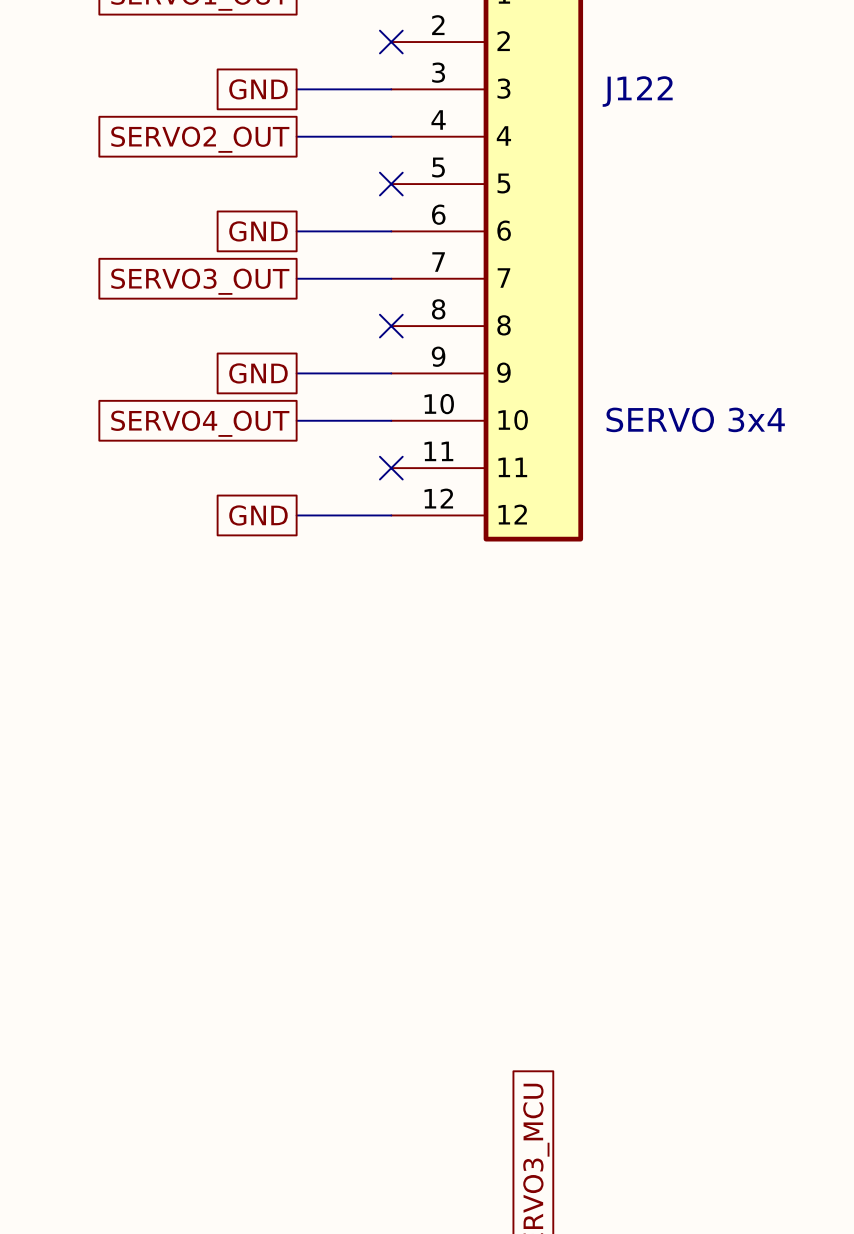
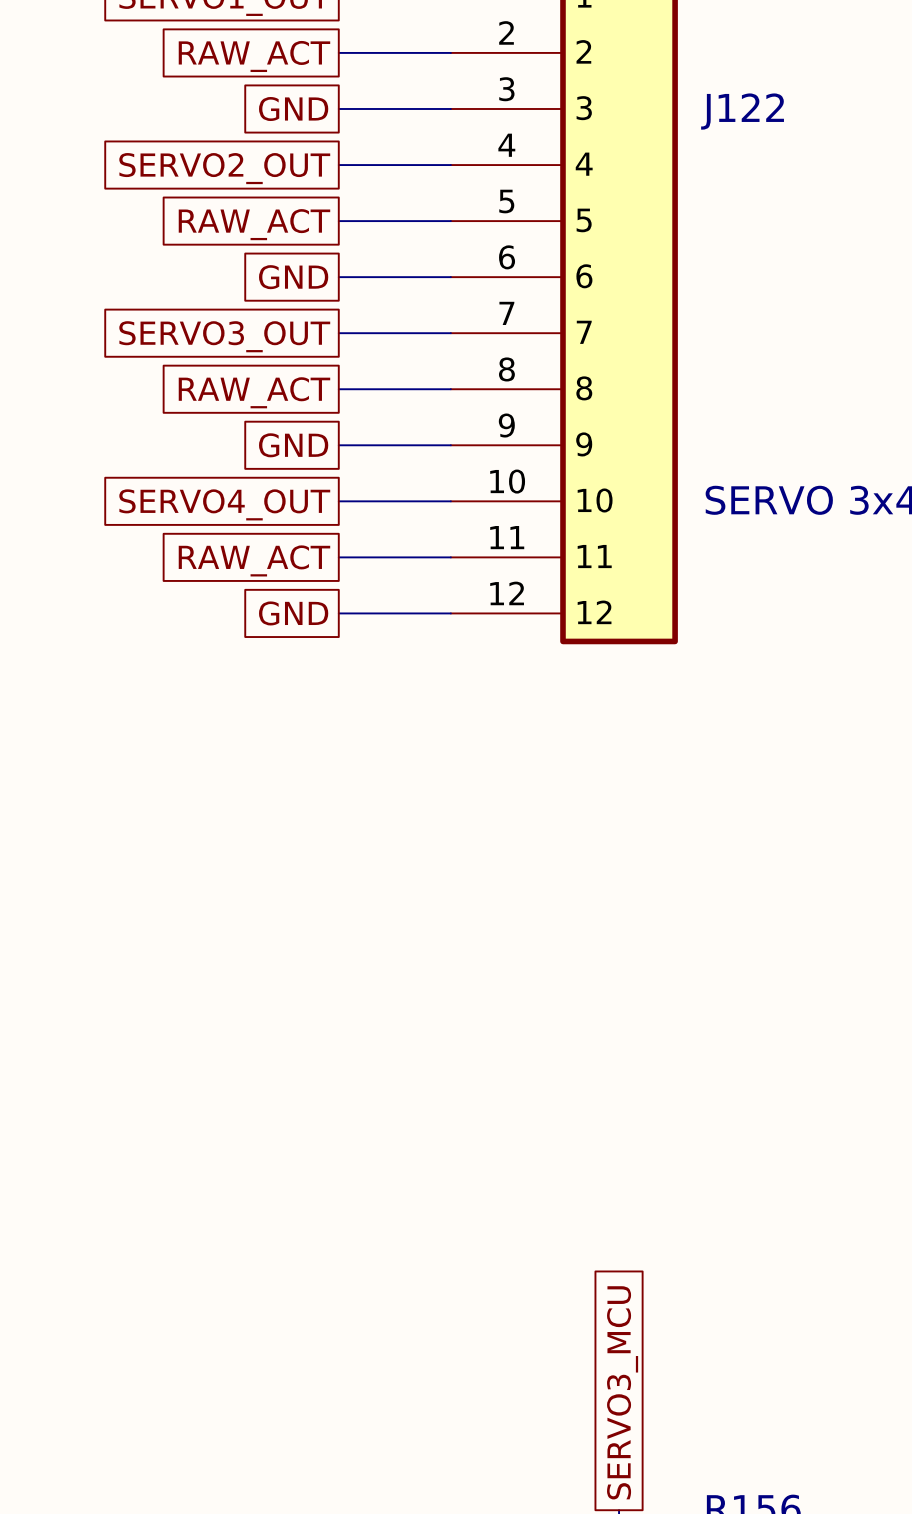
wire: none -> (338, 52) (450, 52)
no-connect mark: (391, 42) -> none
global label: none -> RAW_ACT (254, 56)
wire: none -> (338, 221) (450, 221)
no-connect mark: (391, 184) -> none
global label: none -> RAW_ACT (254, 224)
wire: none -> (338, 389) (450, 389)
no-connect mark: (391, 326) -> none
global label: none -> RAW_ACT (254, 392)
wire: none -> (338, 557) (450, 557)
no-connect mark: (391, 468) -> none
global label: none -> RAW_ACT (254, 560)

